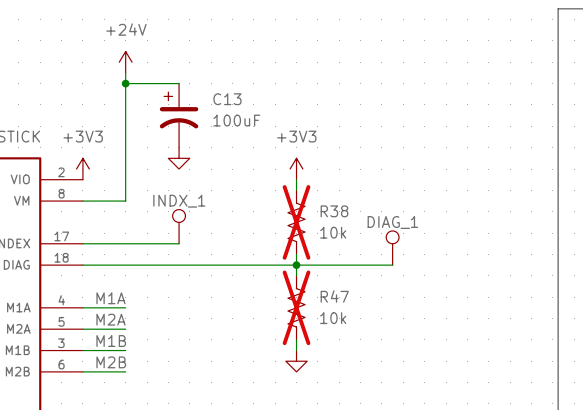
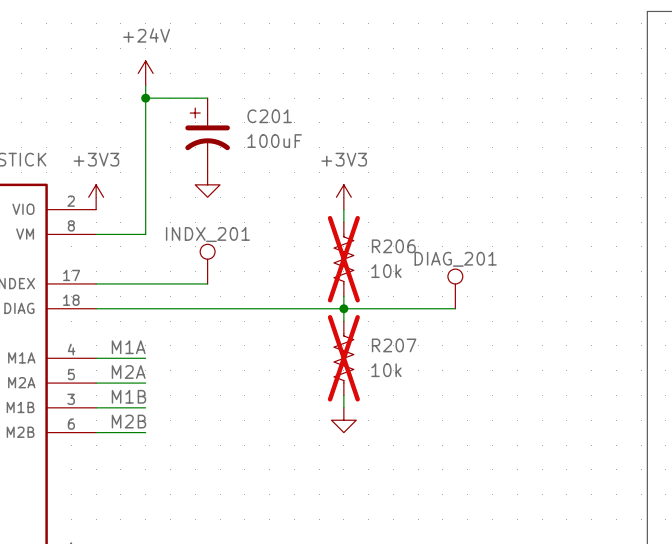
C13 name: C13 (227, 99) -> C201 (269, 116)
INDX_1 name: INDX_1 (179, 201) -> INDX_201 (207, 234)
R38 name: R38 (334, 211) -> R206 (393, 246)
DIAG_1 name: DIAG_1 (392, 222) -> DIAG_201 (455, 259)
R47 name: R47 (334, 296) -> R207 (394, 345)

